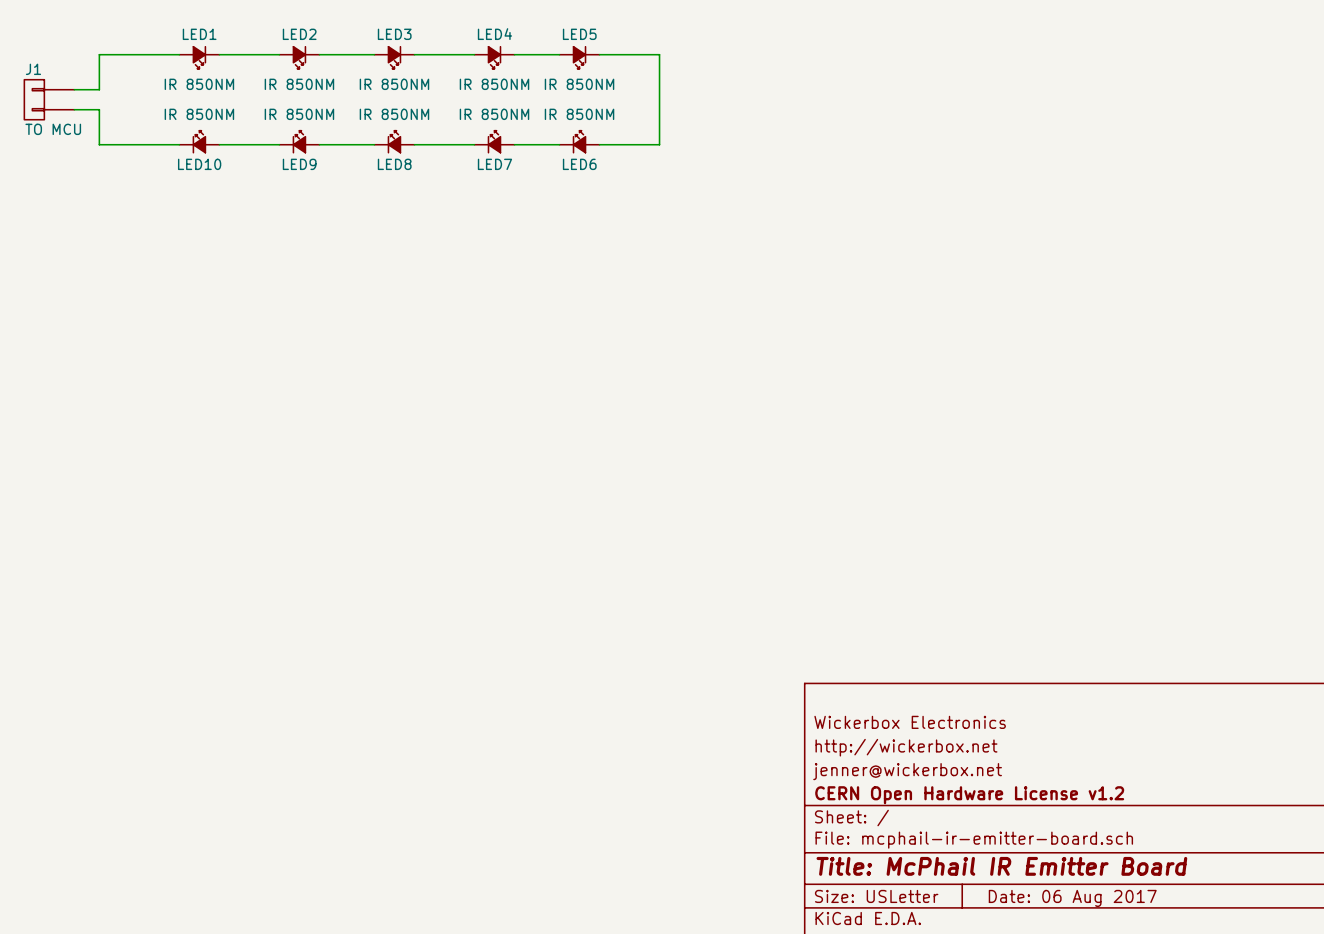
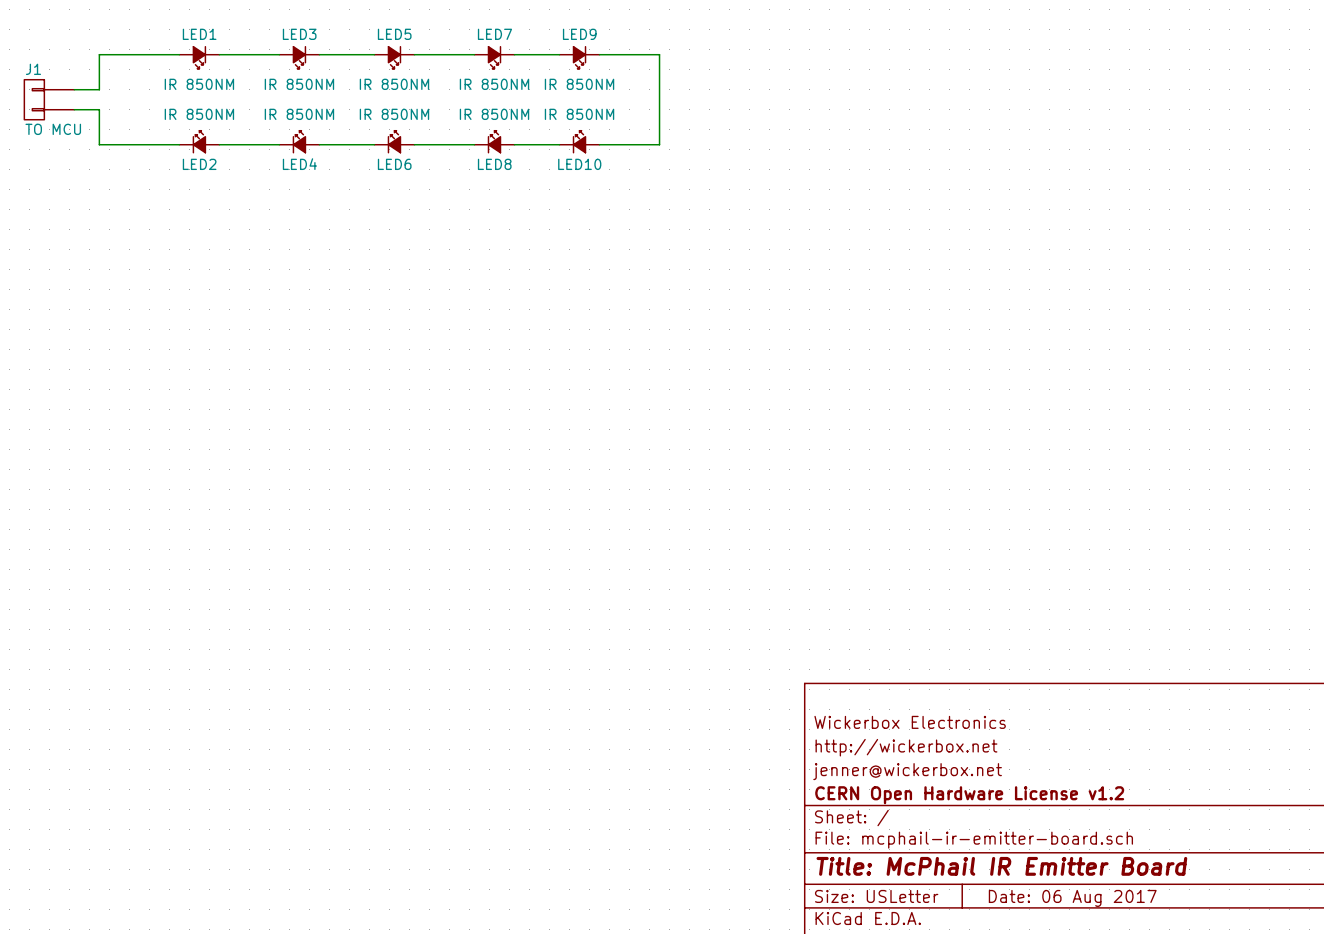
LED2 name: LED2 (299, 34) -> LED3 (299, 34)
LED3 name: LED3 (394, 34) -> LED5 (394, 34)
LED4 name: LED4 (494, 34) -> LED7 (494, 34)
LED5 name: LED5 (579, 34) -> LED9 (579, 34)
LED10 name: LED10 (199, 164) -> LED2 (199, 164)
LED9 name: LED9 (299, 164) -> LED4 (299, 164)
LED8 name: LED8 (394, 164) -> LED6 (394, 164)
LED7 name: LED7 (494, 164) -> LED8 (494, 164)
LED6 name: LED6 (579, 164) -> LED10 (579, 164)

